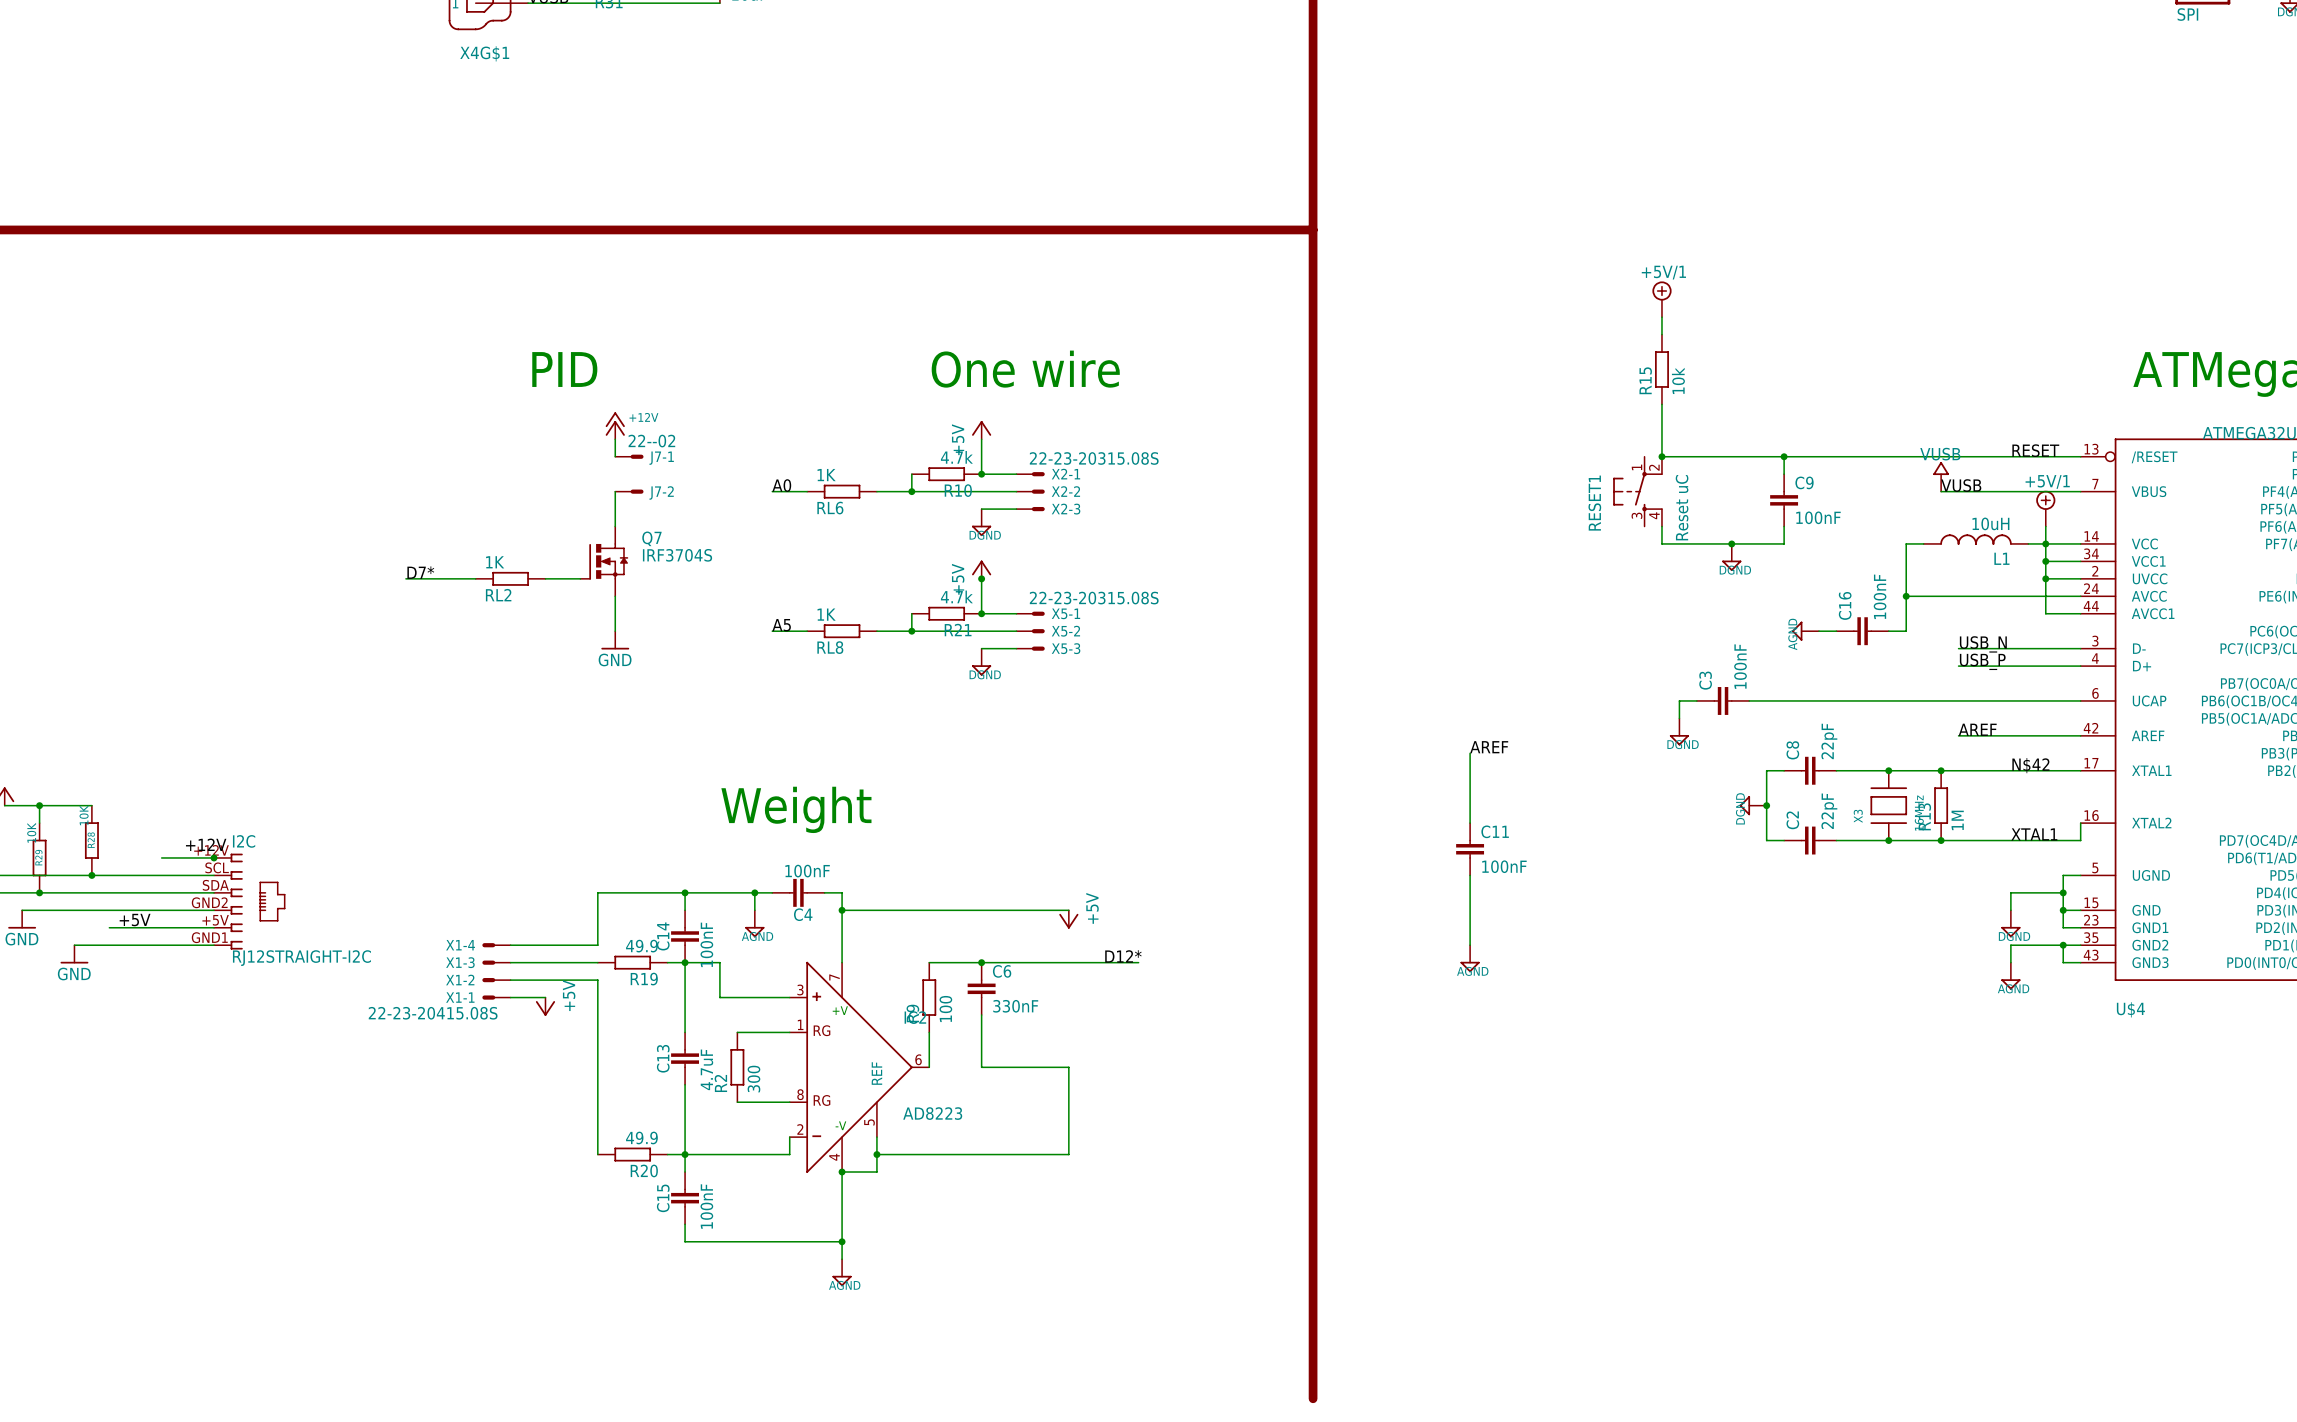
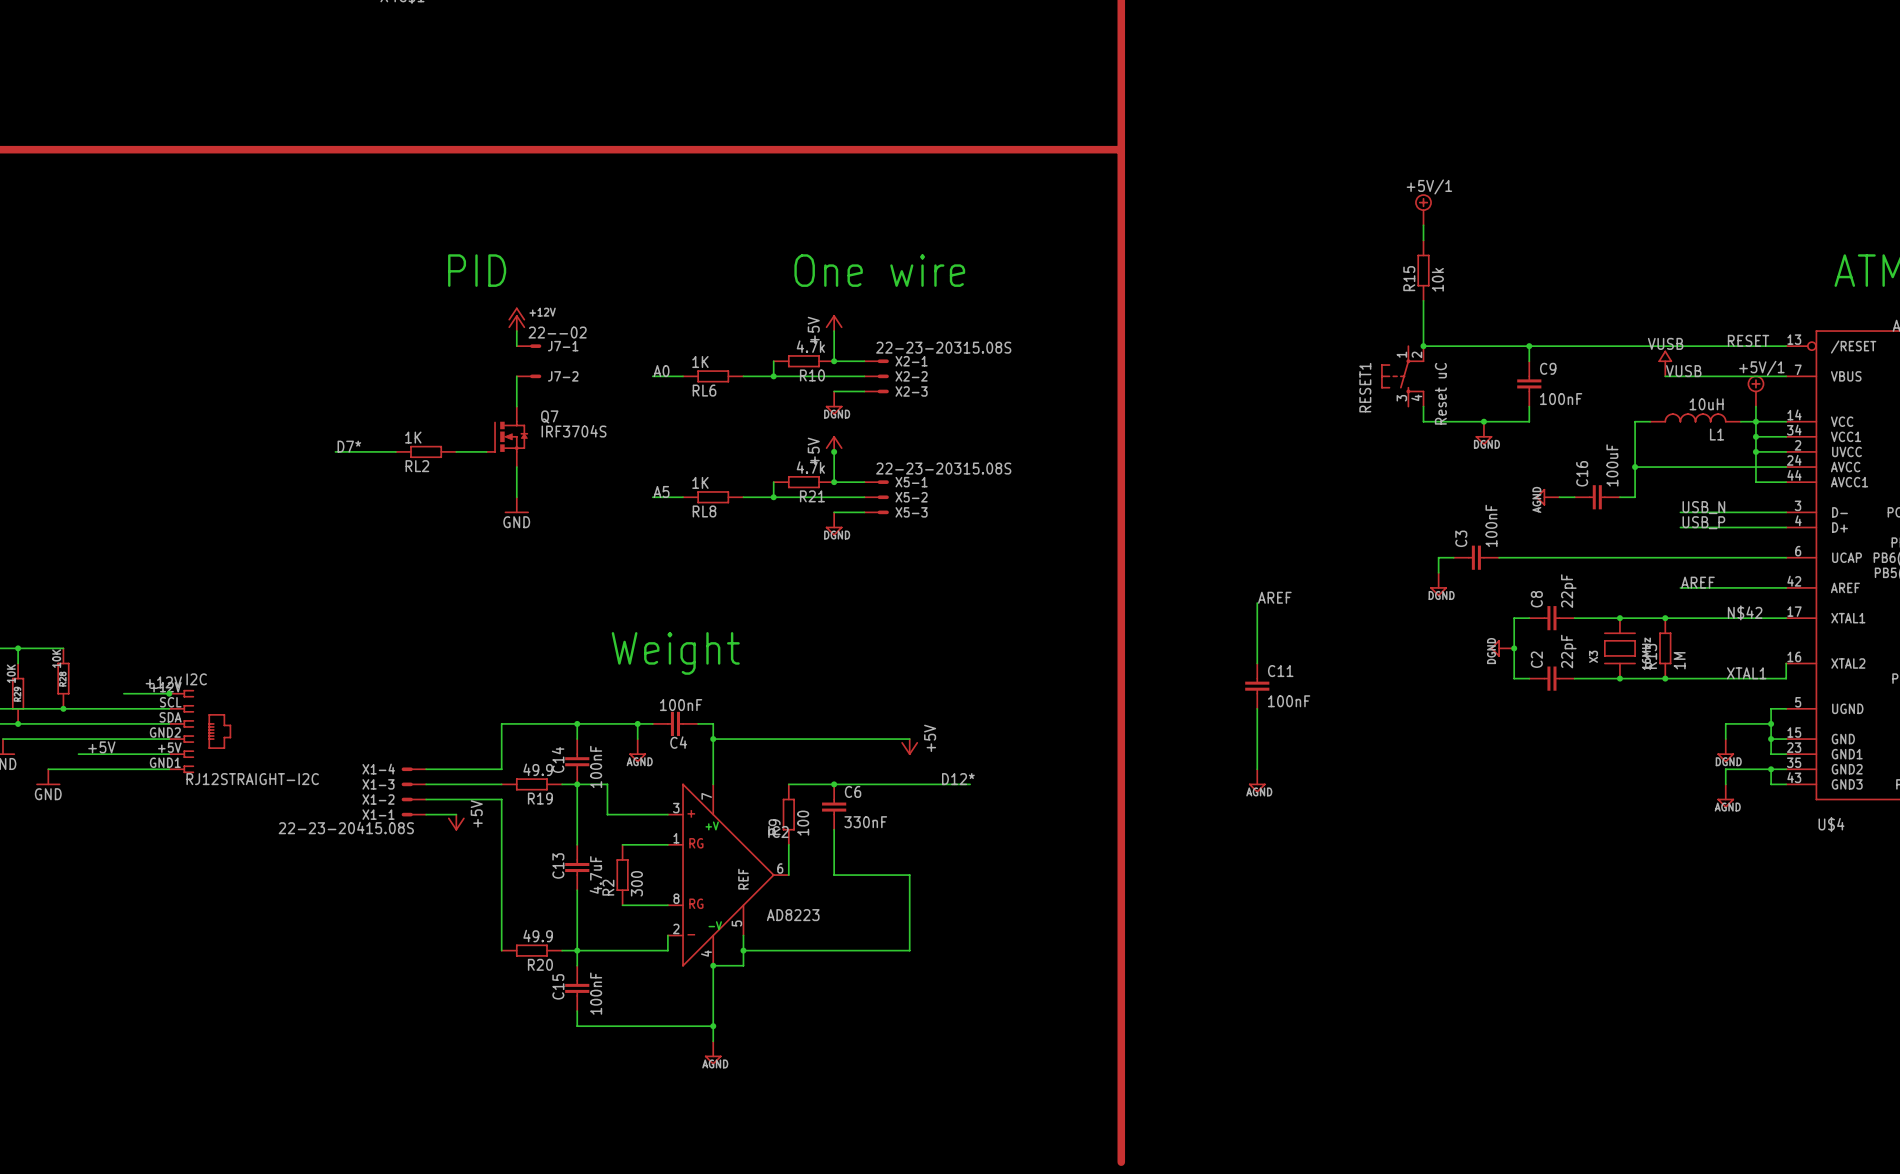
C16 value: 100nF (1880, 596) -> 100uF (1612, 465)

